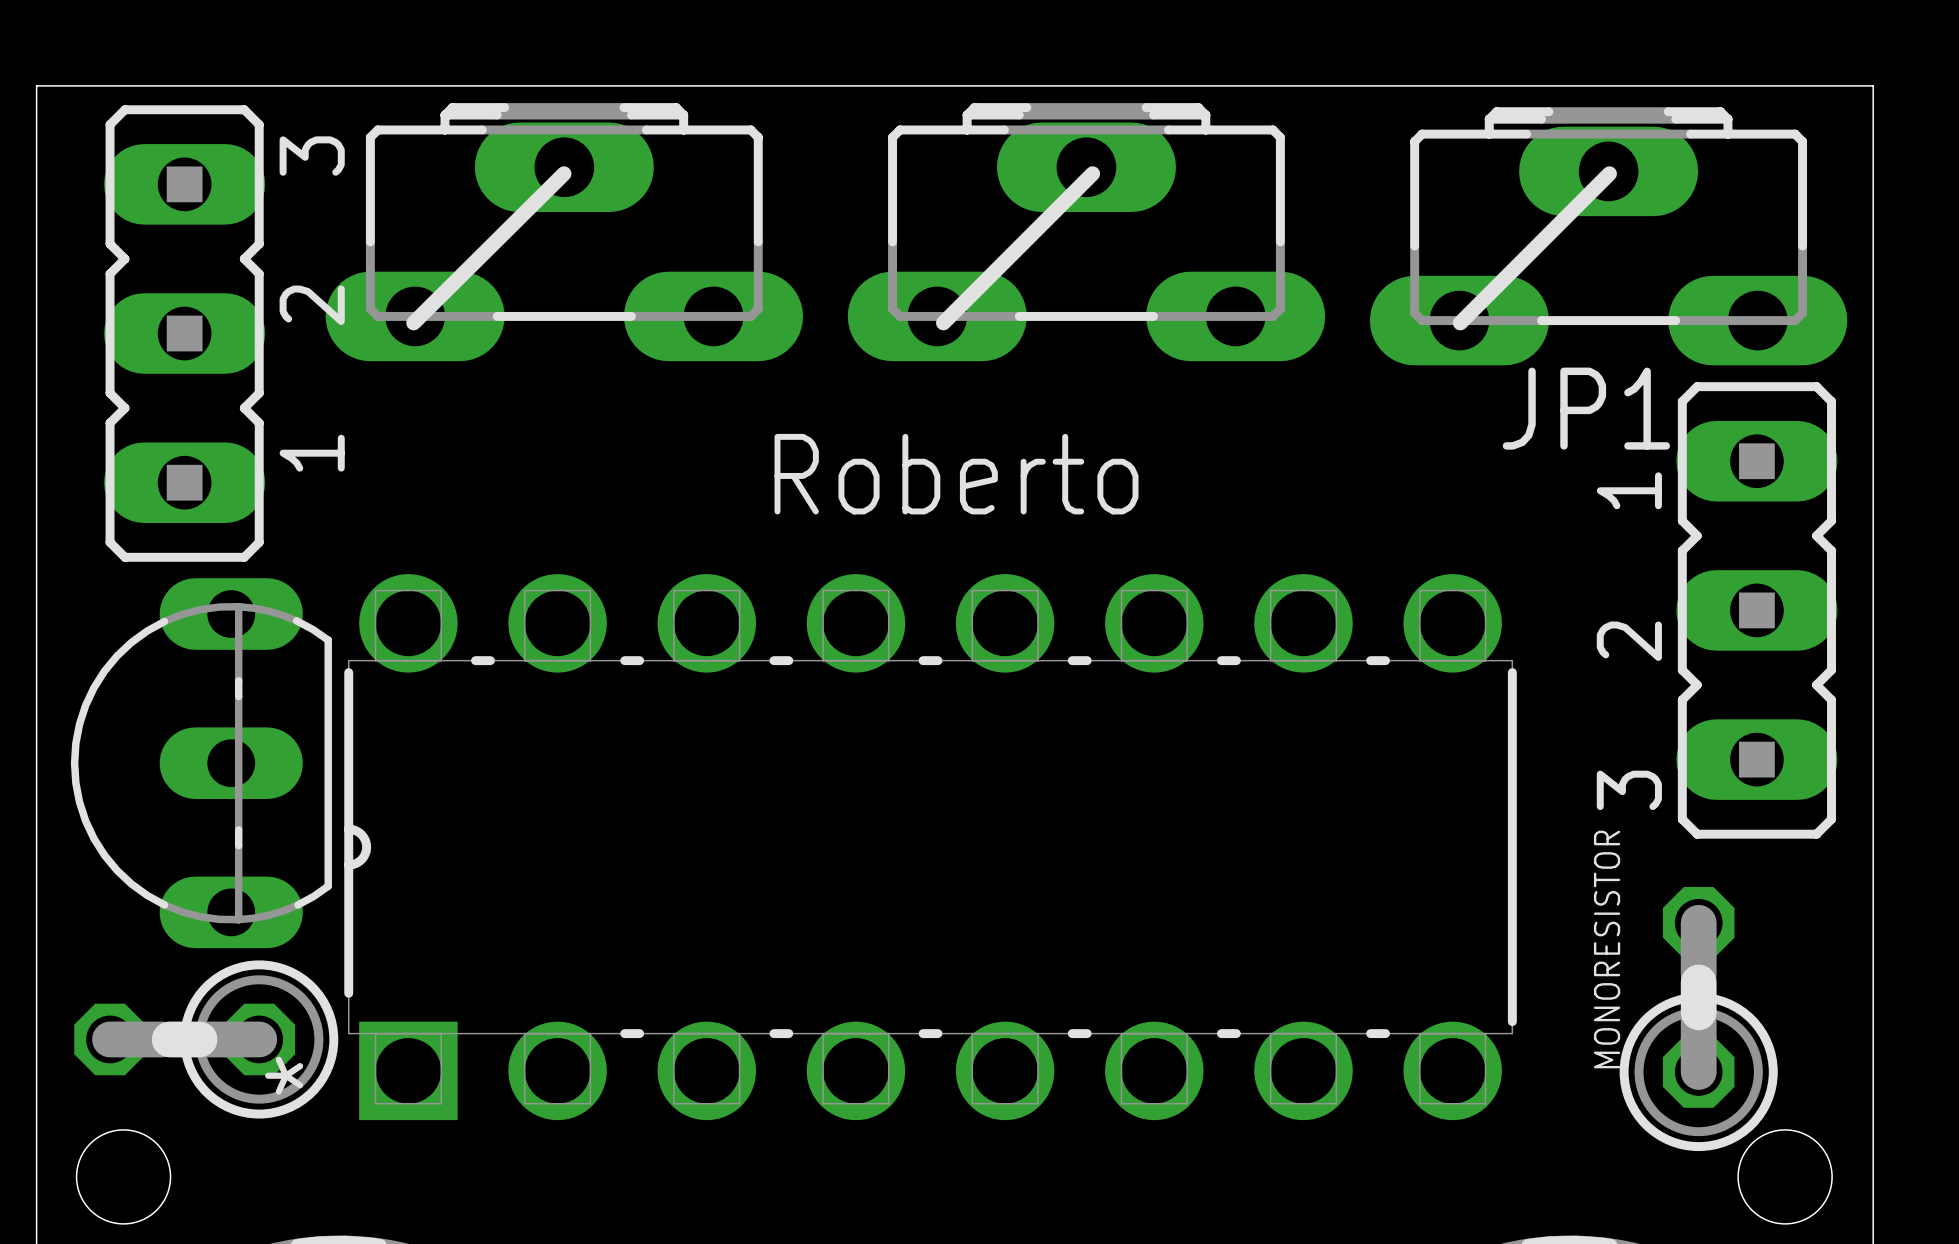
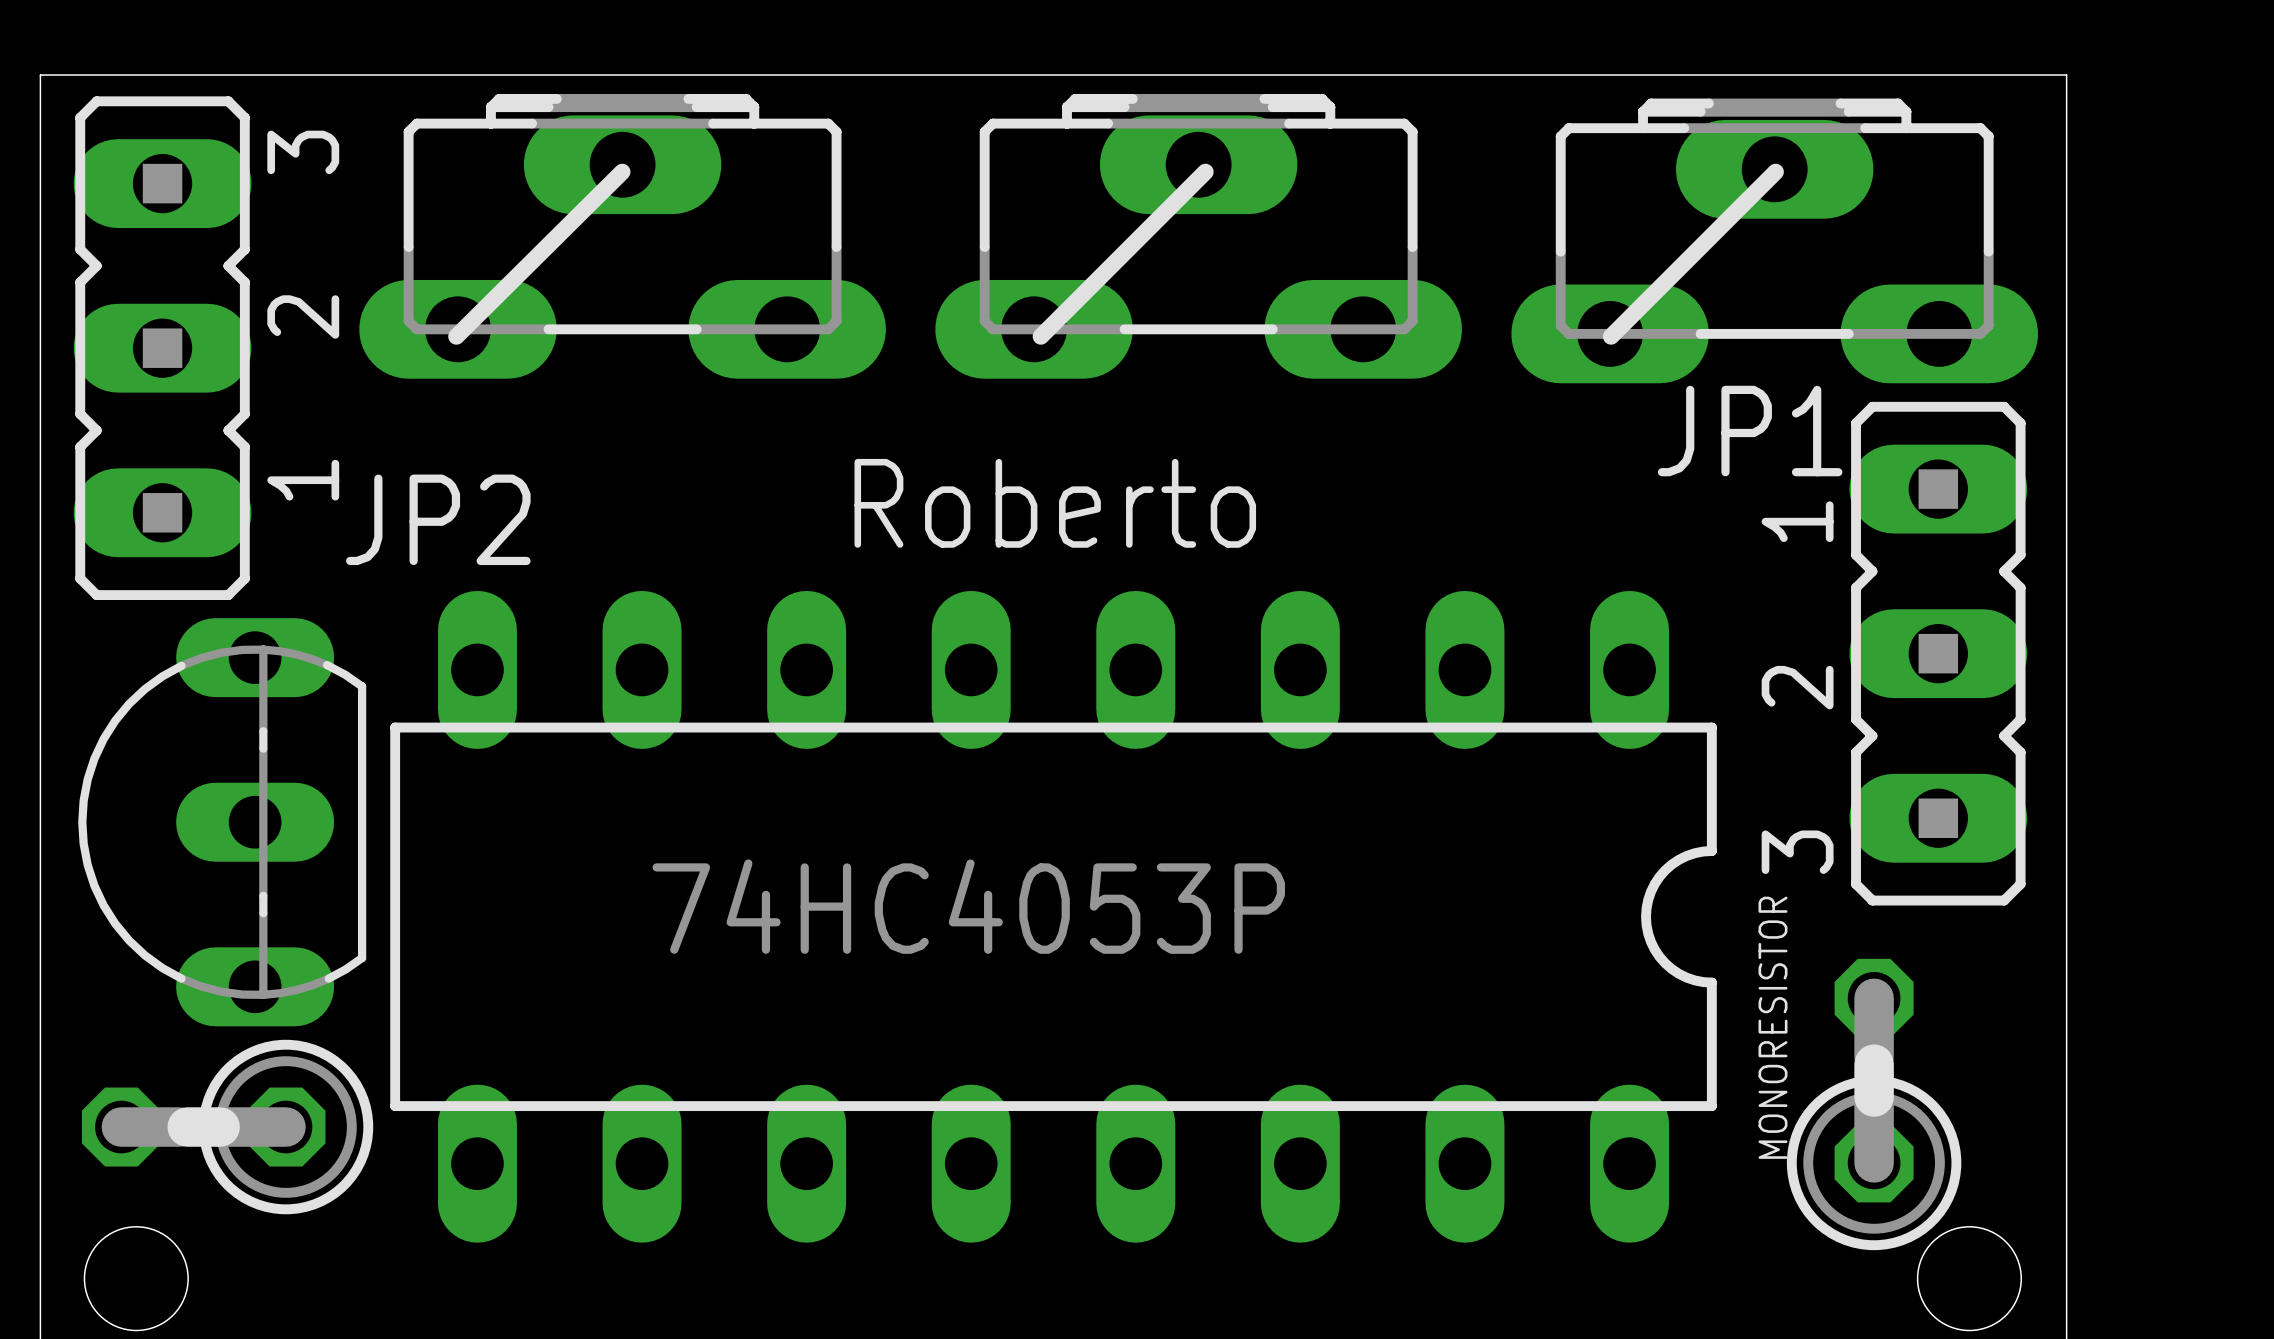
JP2 position: (184, 333) -> (162, 348)
JP2 name: none -> JP2 (438, 519)
part footprint: [344, 574, 1517, 1121] -> [390, 590, 1717, 1243]
part value: none -> 74HC4053P (968, 906)

